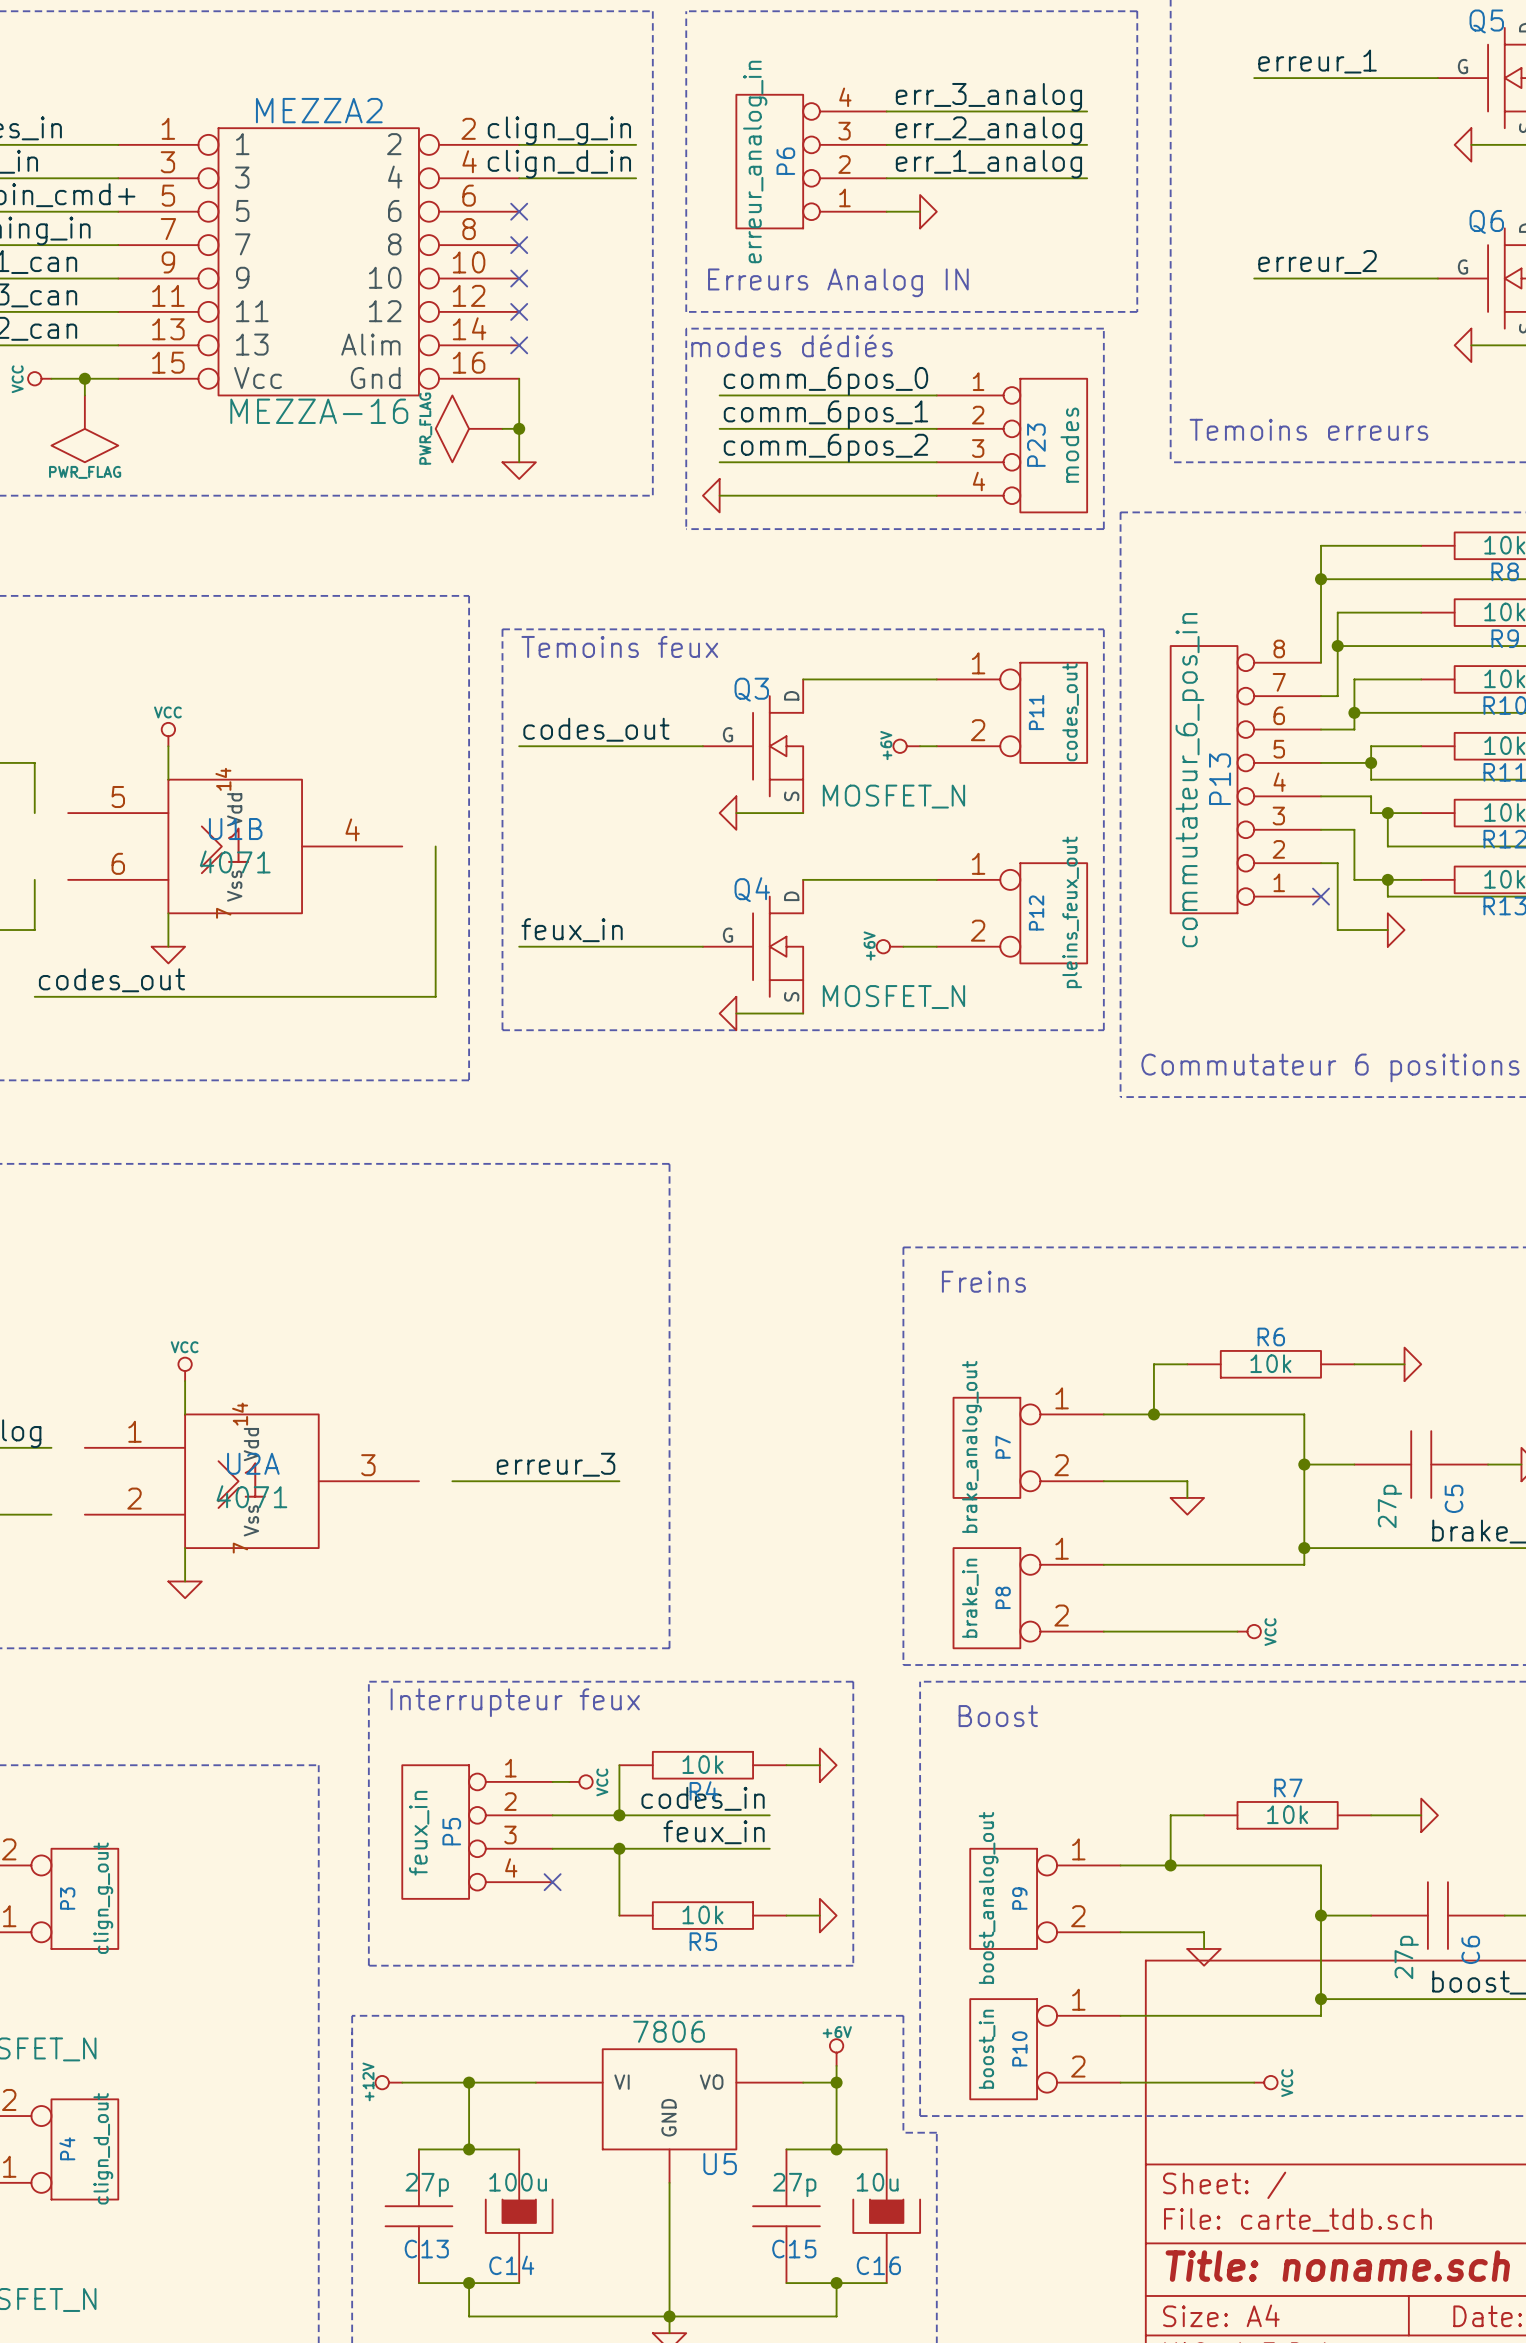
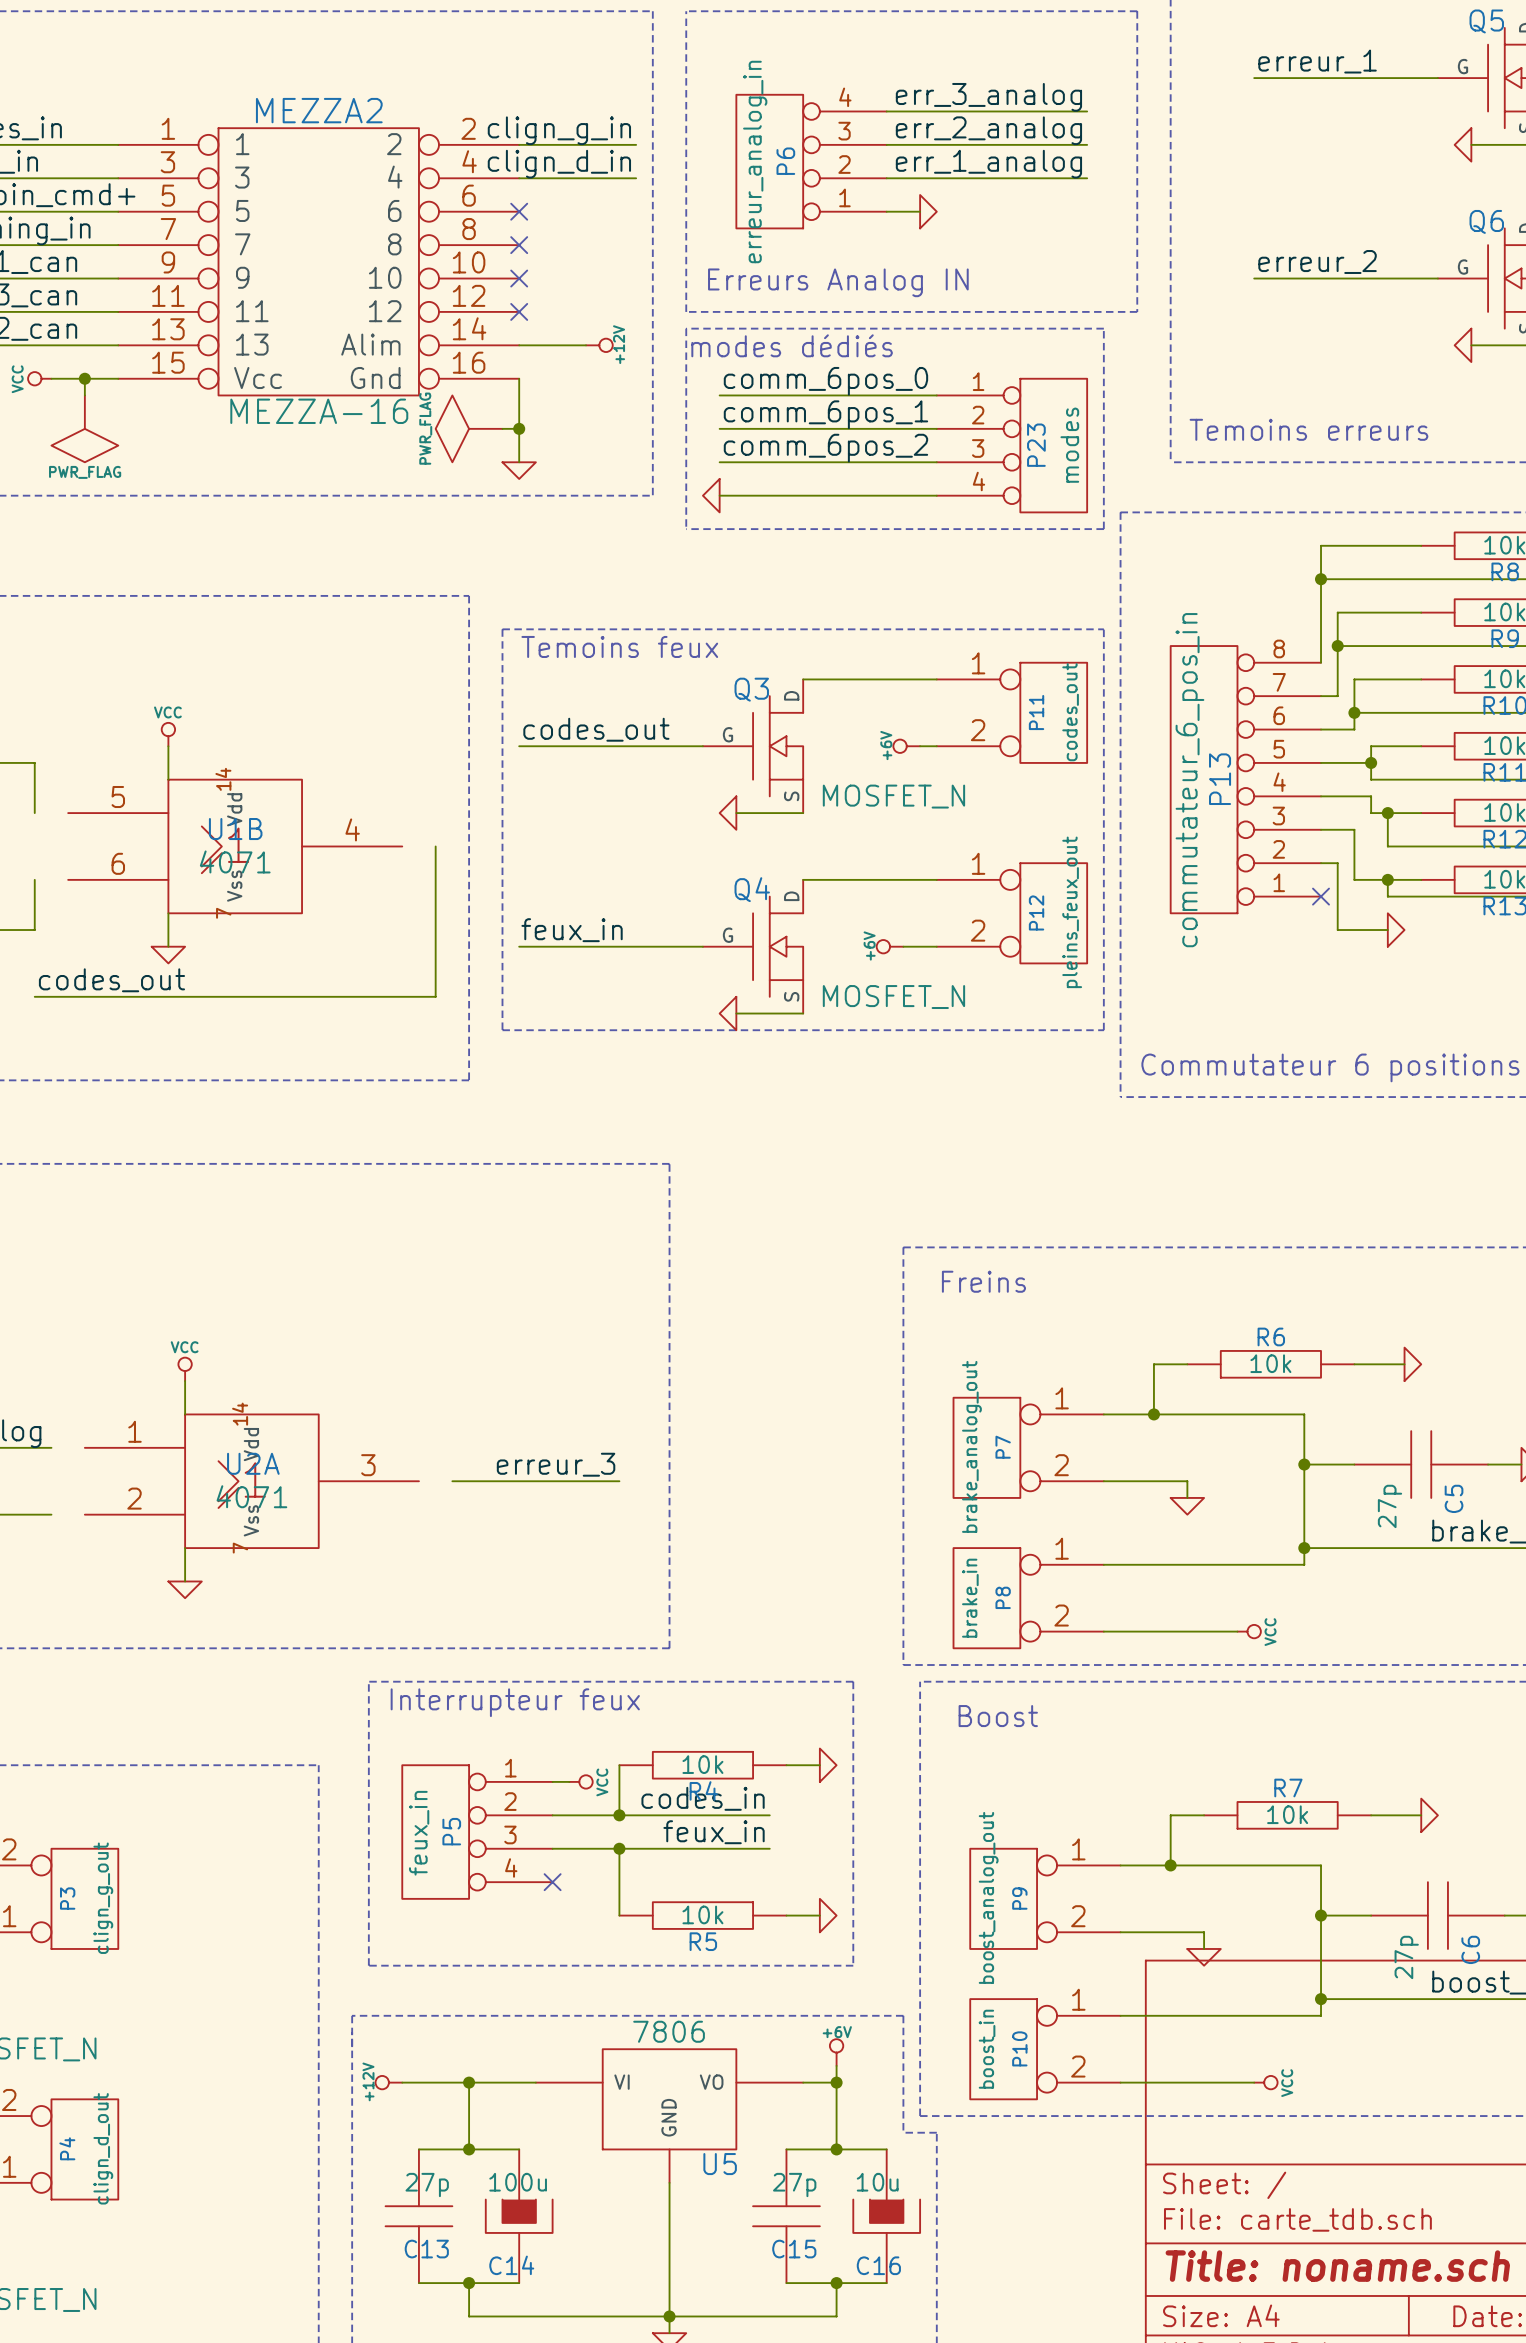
wire: none -> (519, 345) (586, 345)
no-connect mark: (519, 345) -> none
power symbol: none -> +12V (599, 345)

